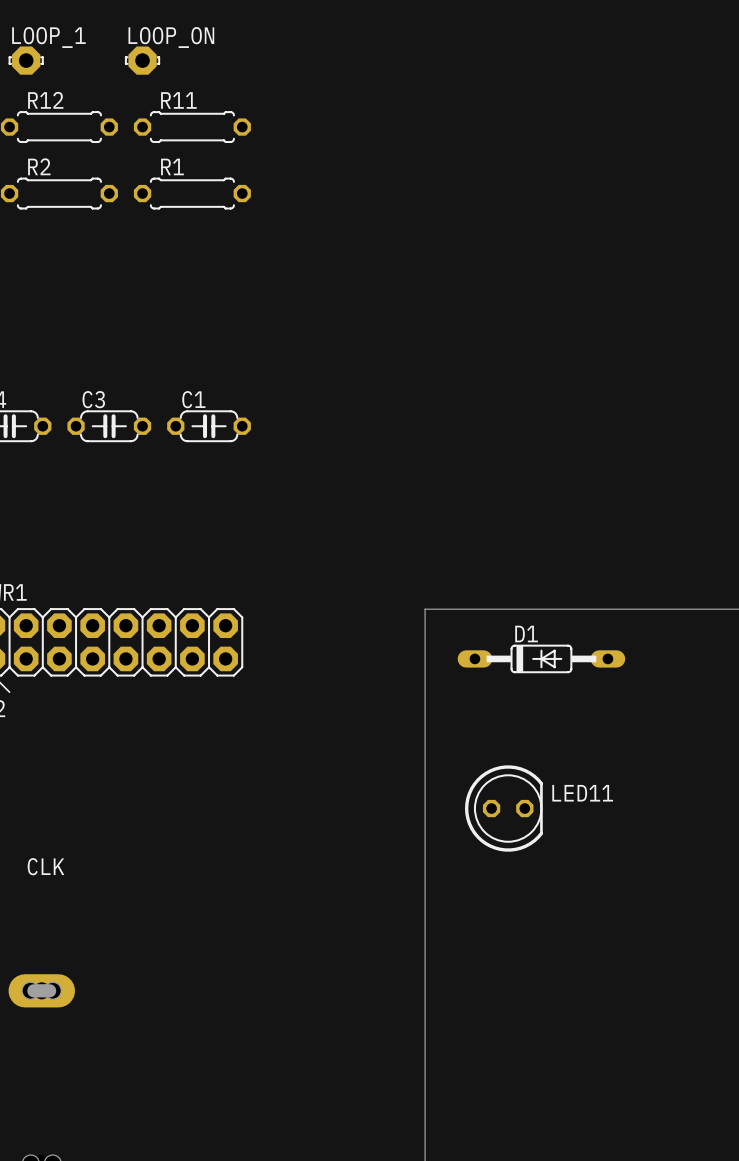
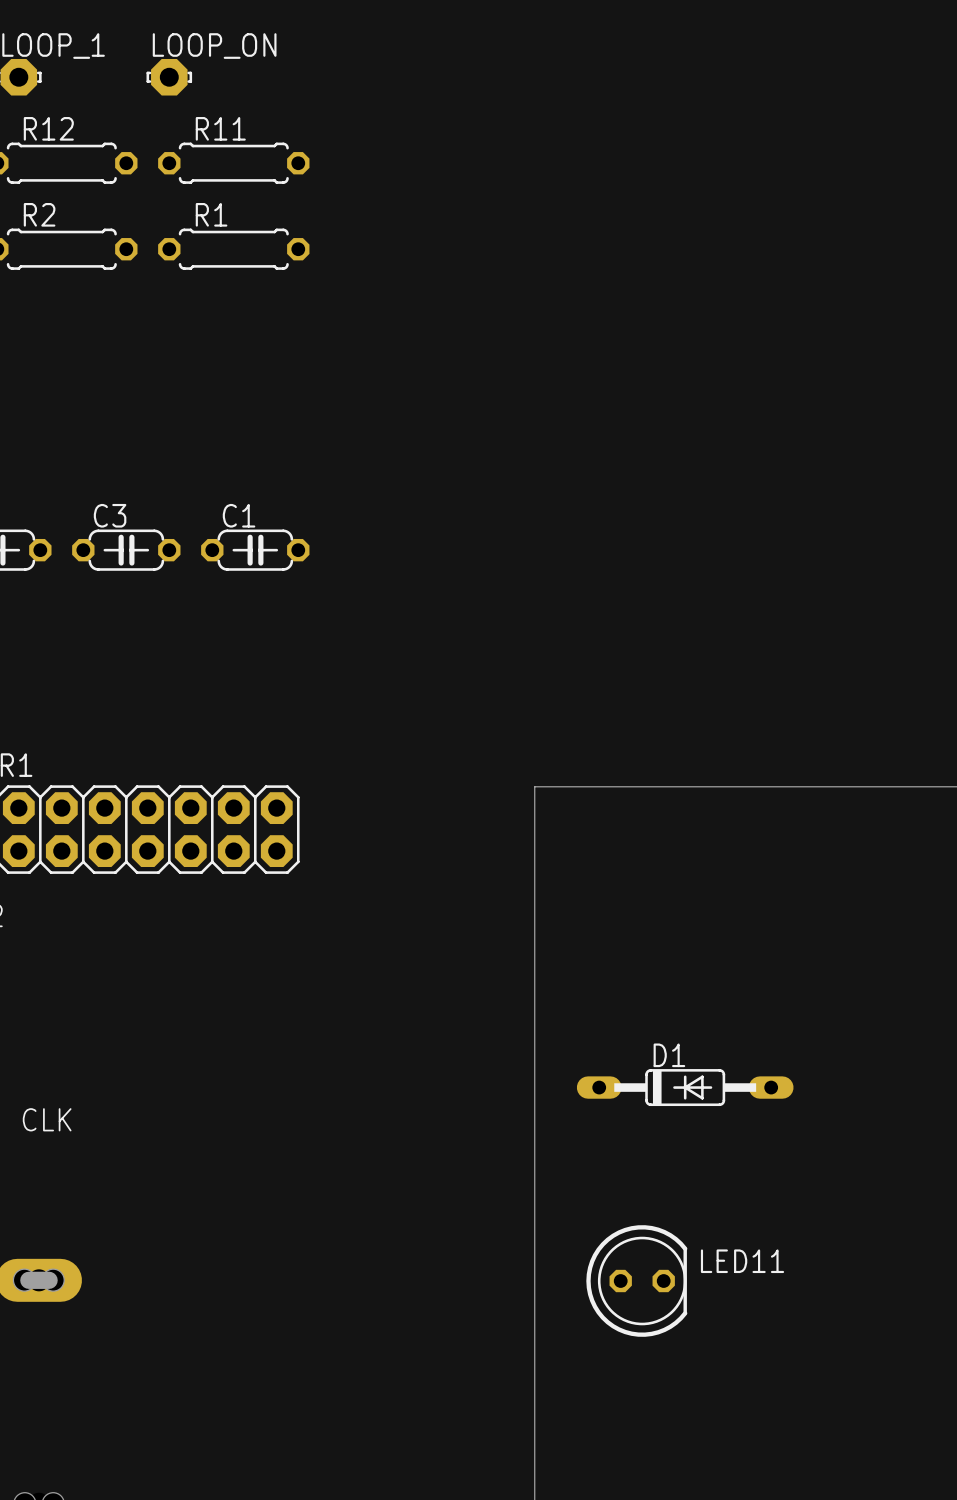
D1 position: (541, 658) -> (685, 1087)
LED11 position: (504, 808) -> (636, 1281)

